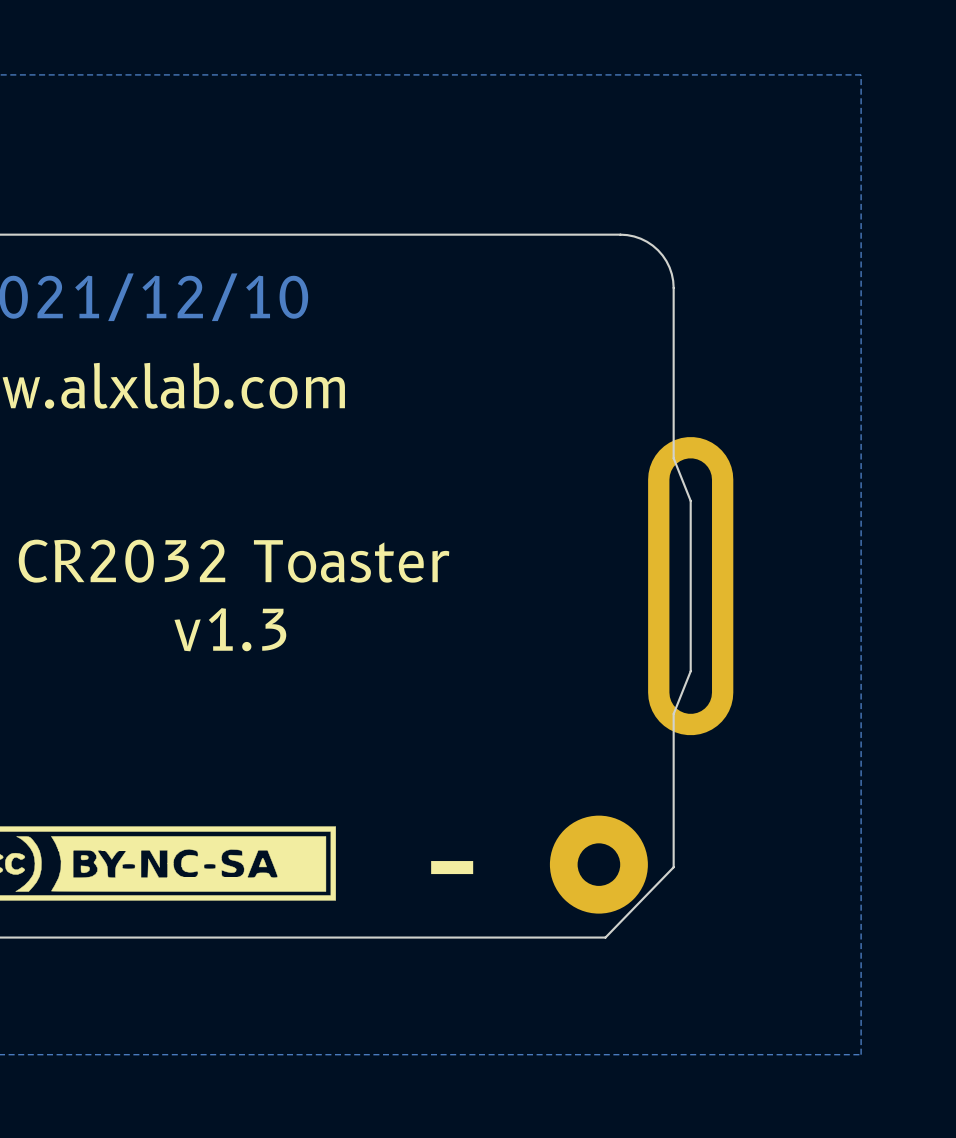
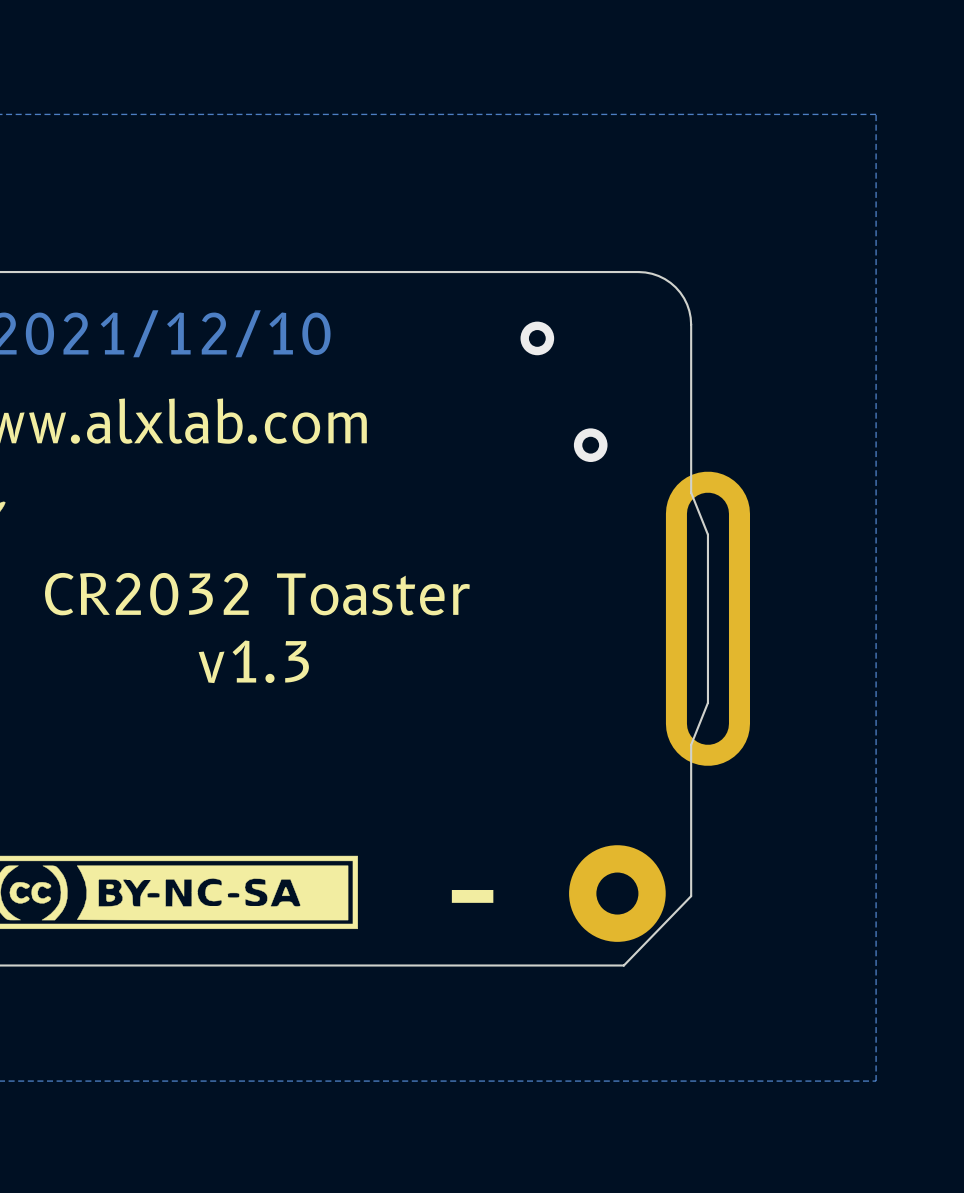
via: none -> (537, 338)
via: none -> (590, 445)

